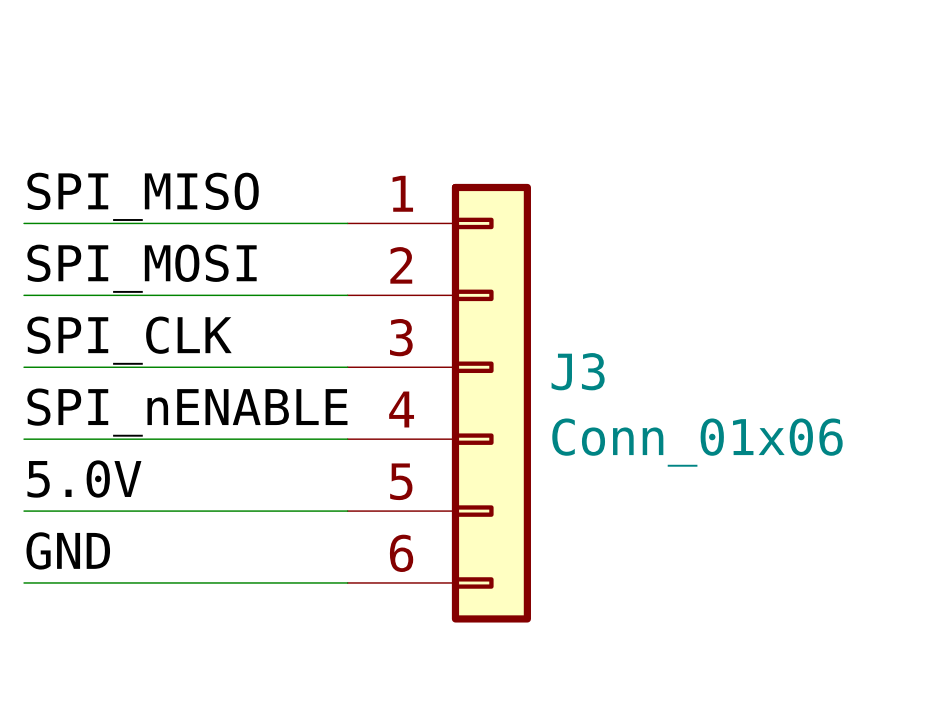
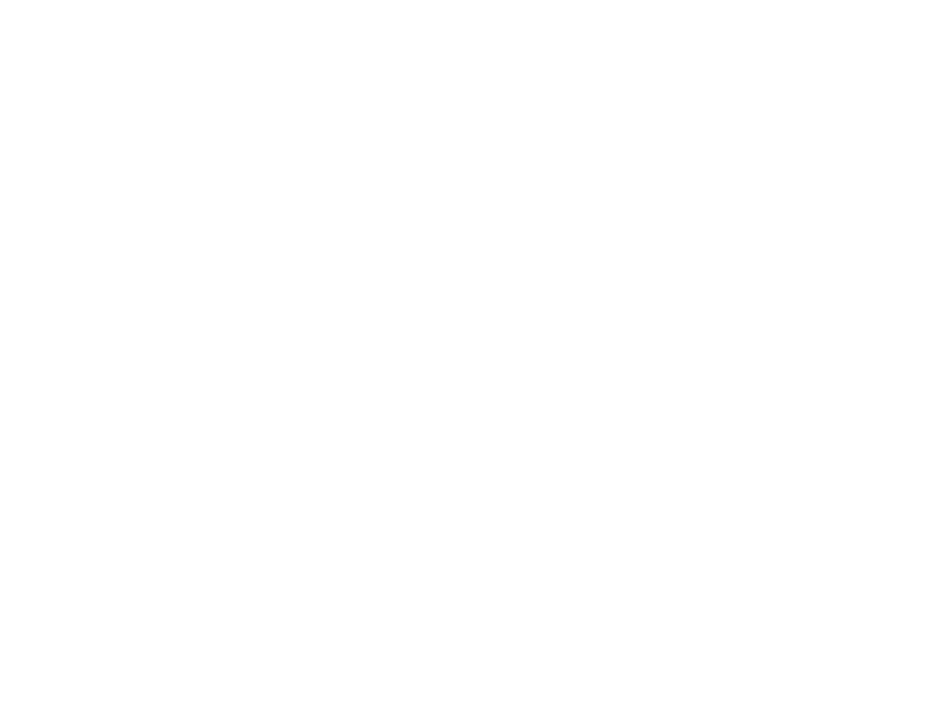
label: SPI_MISO (143, 196) -> none
wire: (24, 223) (347, 223) -> none
label: SPI_MOSI (142, 268) -> none
wire: (24, 295) (347, 295) -> none
label: SPI_CLK (129, 340) -> none
wire: (24, 367) (347, 367) -> none
J3: Conn_01x06 (439, 403) -> none
label: SPI_nENABLE (187, 412) -> none
wire: (24, 439) (347, 439) -> none
label: 5.0V (84, 479) -> none
wire: (24, 511) (347, 511) -> none
label: GND (68, 550) -> none
wire: (24, 582) (347, 582) -> none

